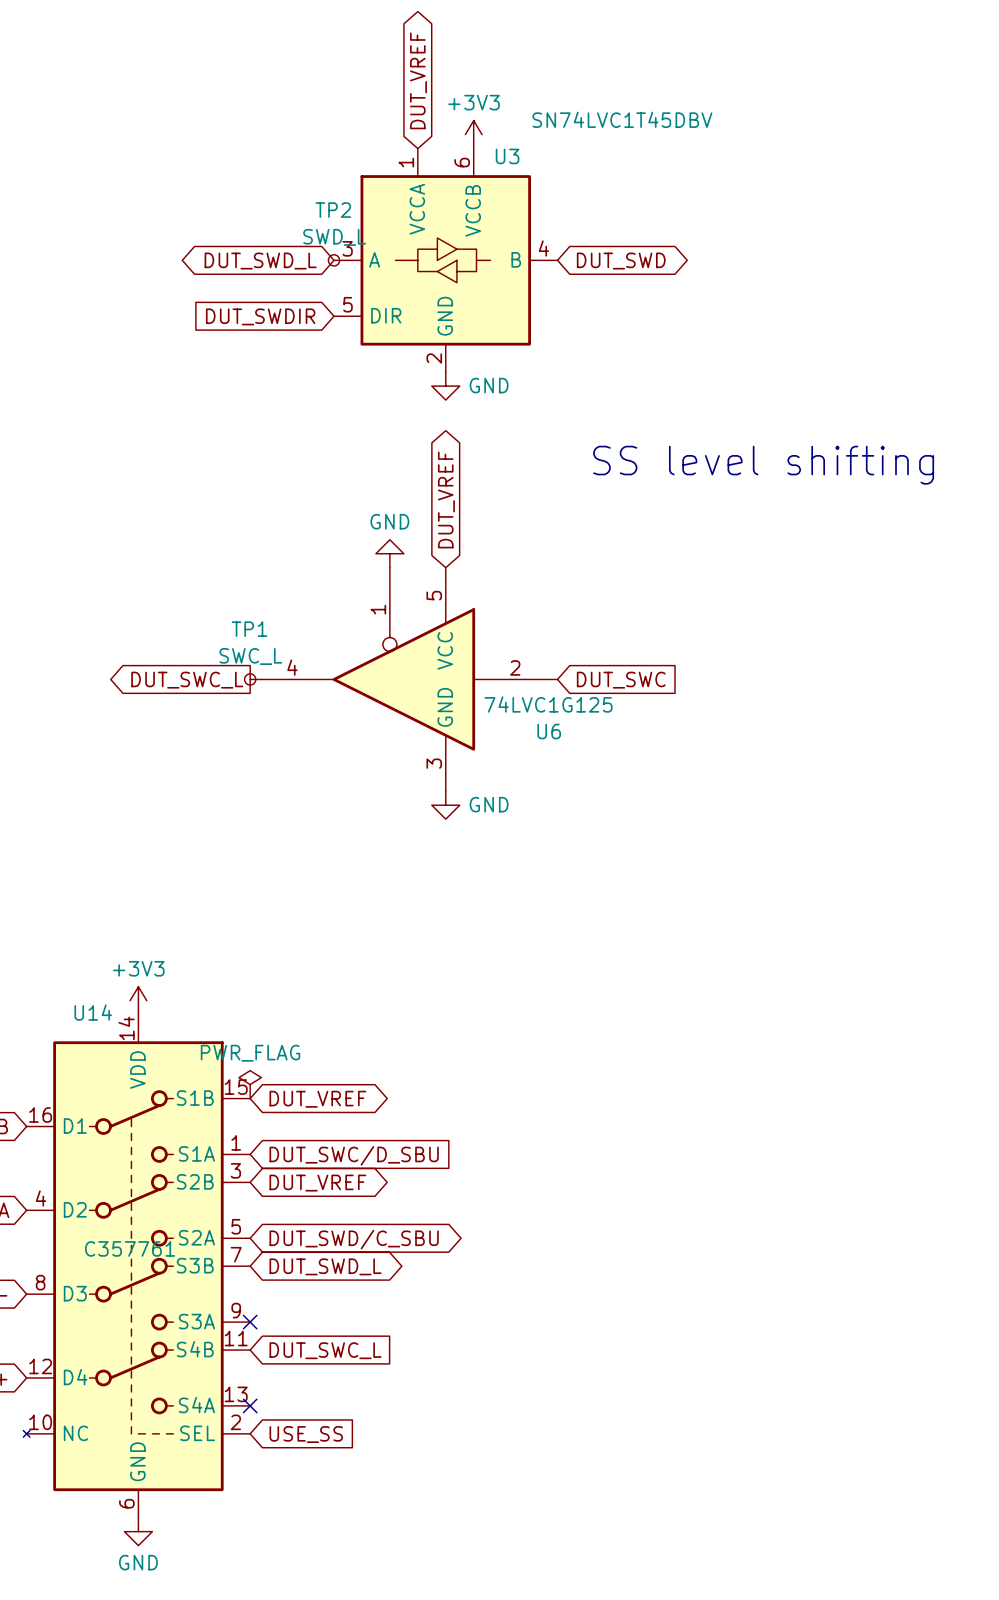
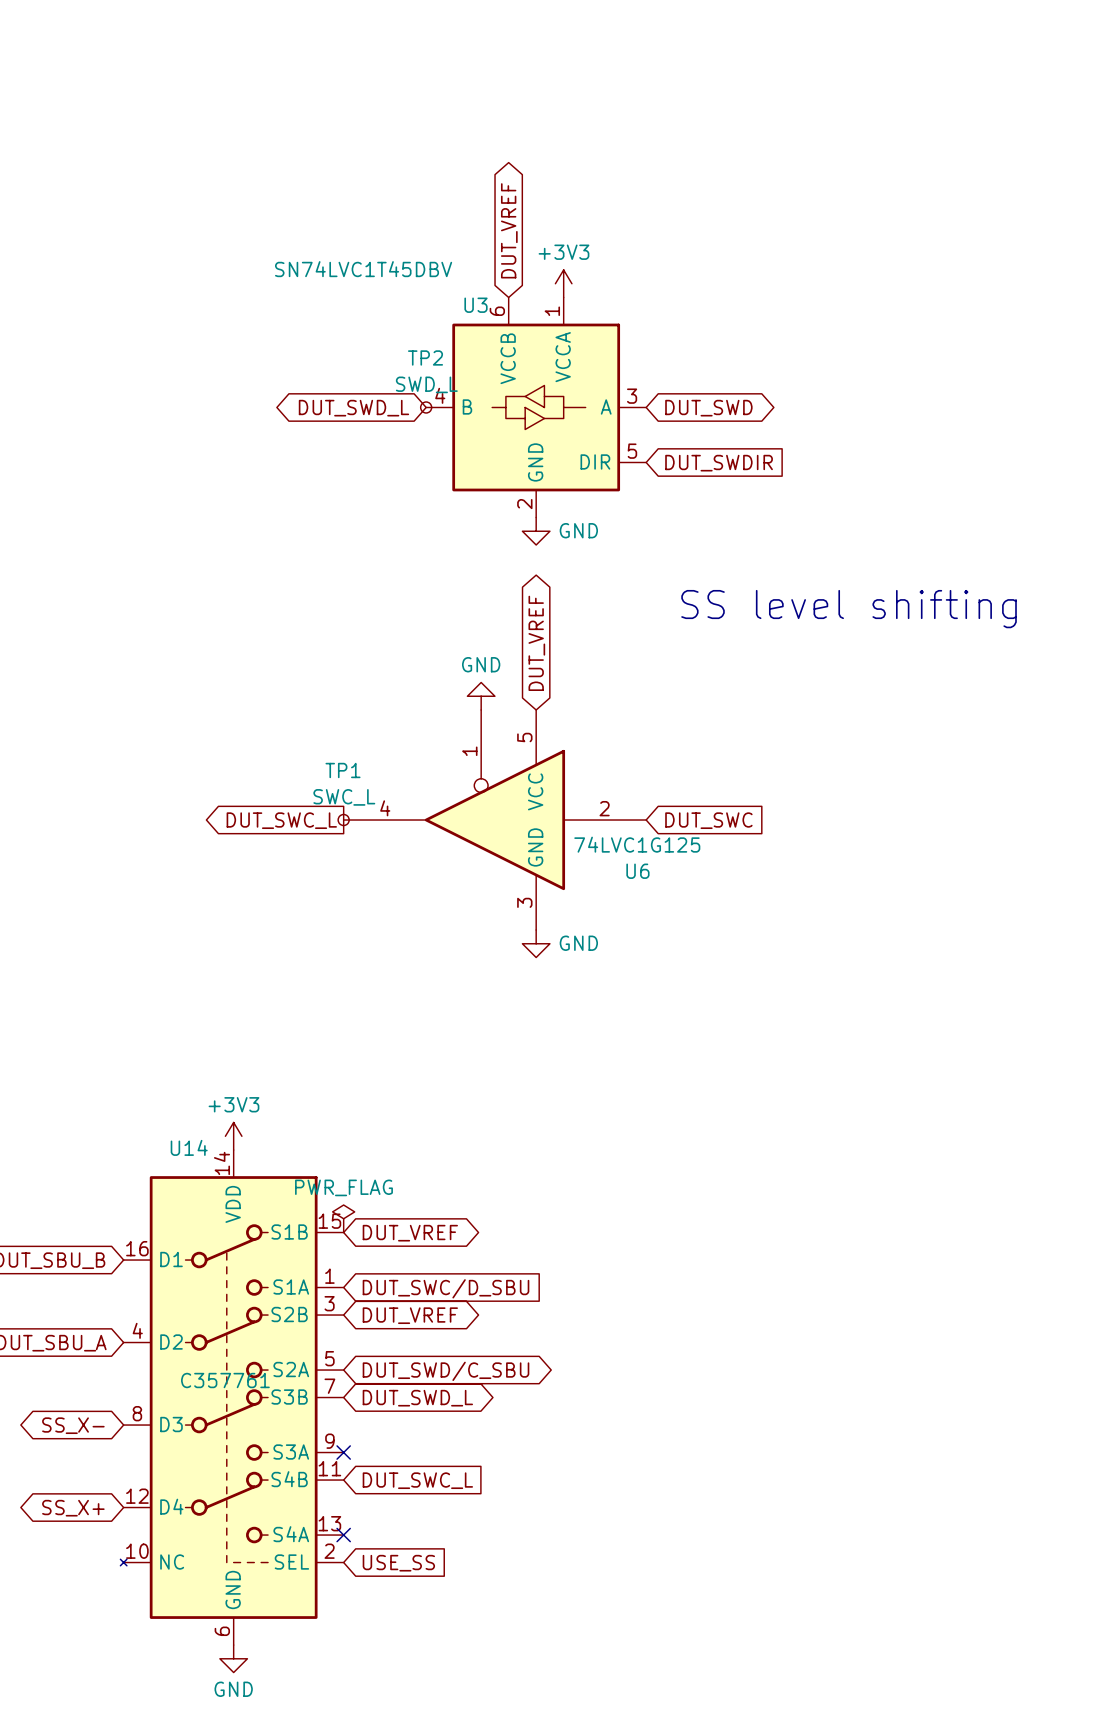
U3 flip: as is (445, 260) -> left-right (536, 407)
global label rotation: 0° (260, 316) -> 180° (719, 463)
global label position: DUT_SWDIR (260, 316) -> DUT_SWDIR (719, 463)

